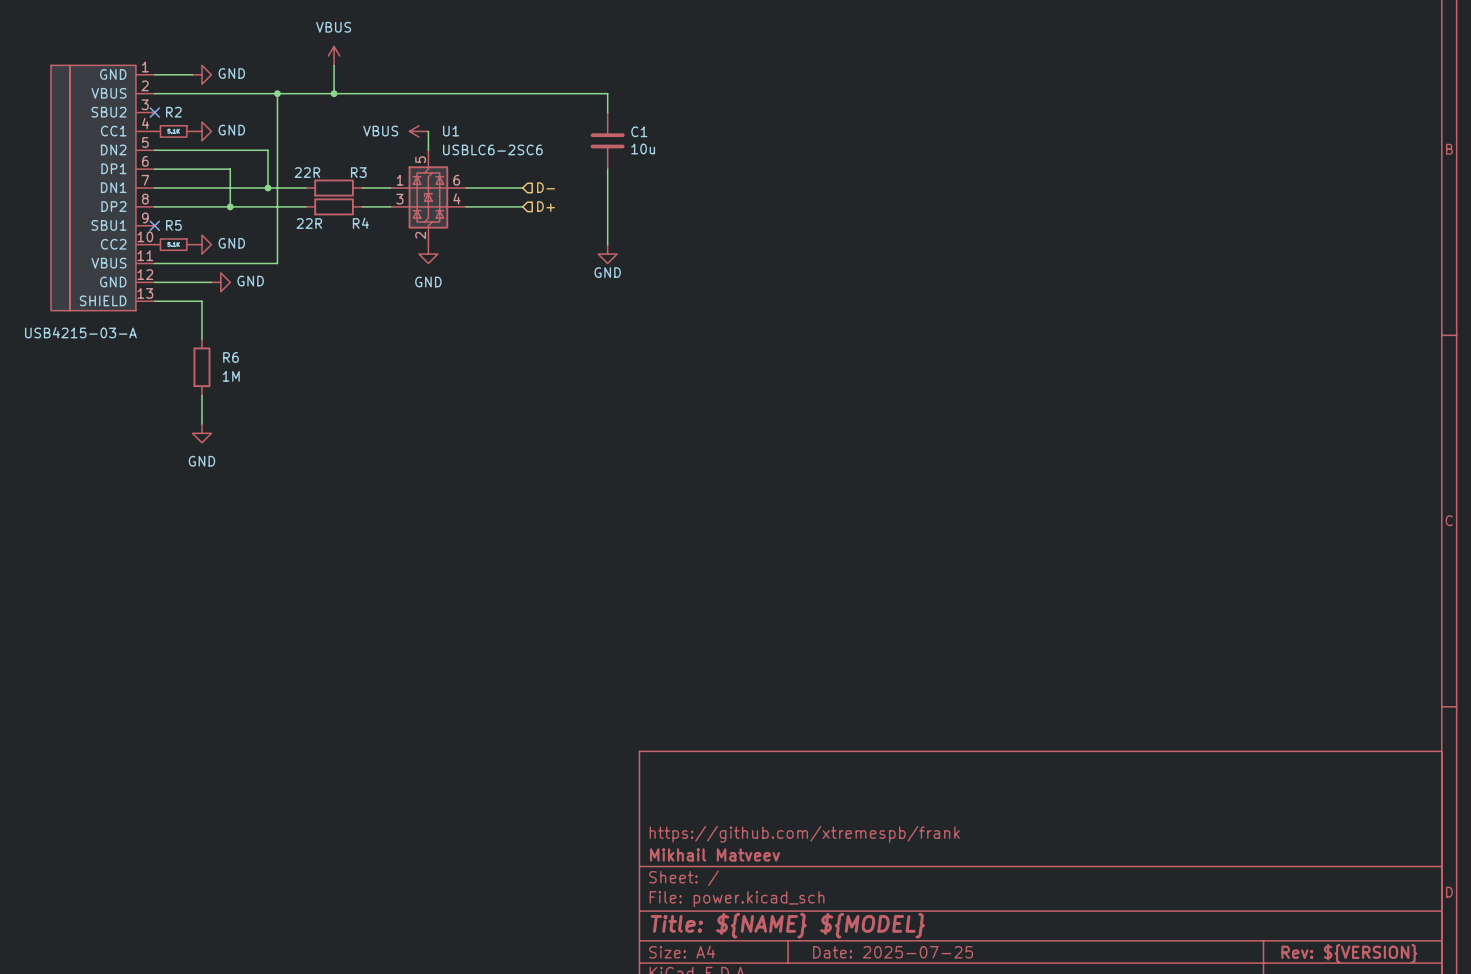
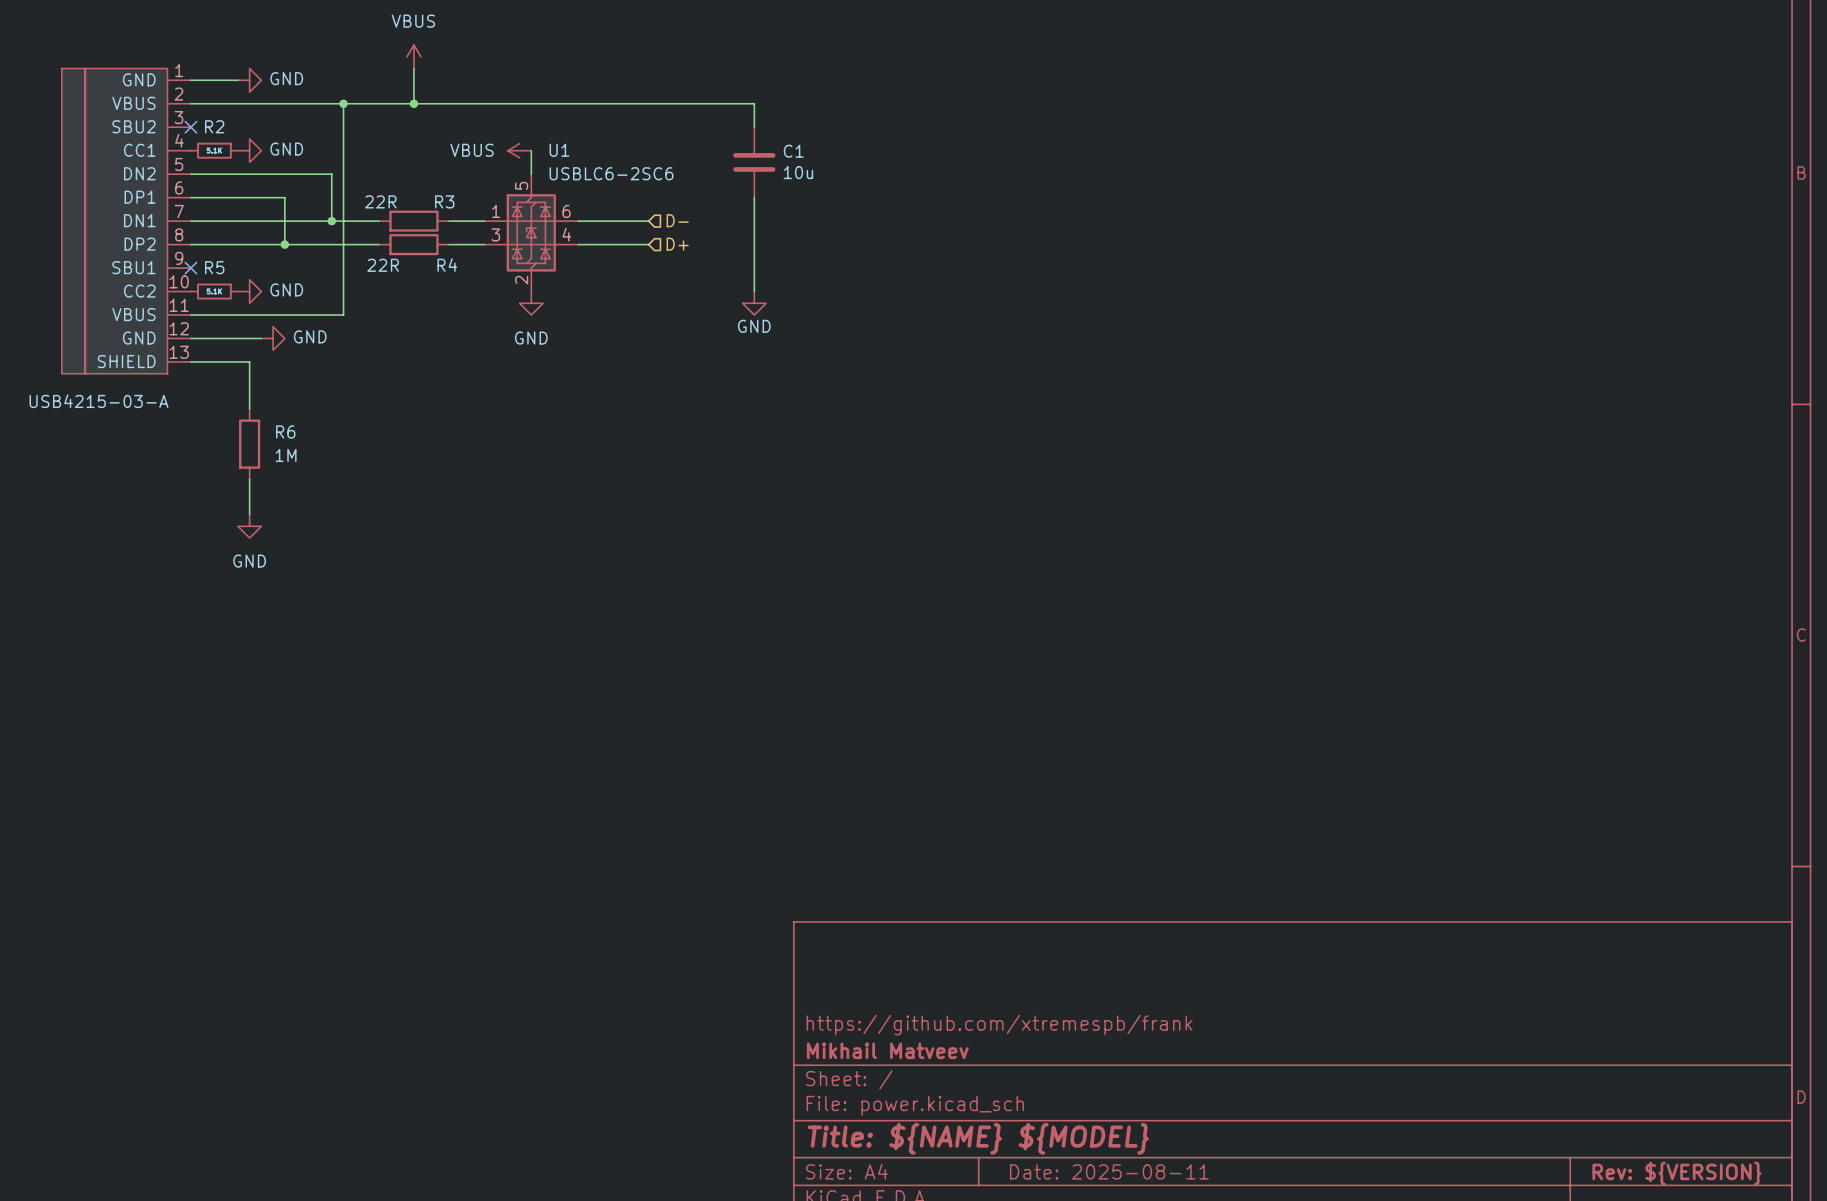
title block: Date: 2025-07-25 (893, 952) -> Date: 2025-08-11 (1109, 1171)

